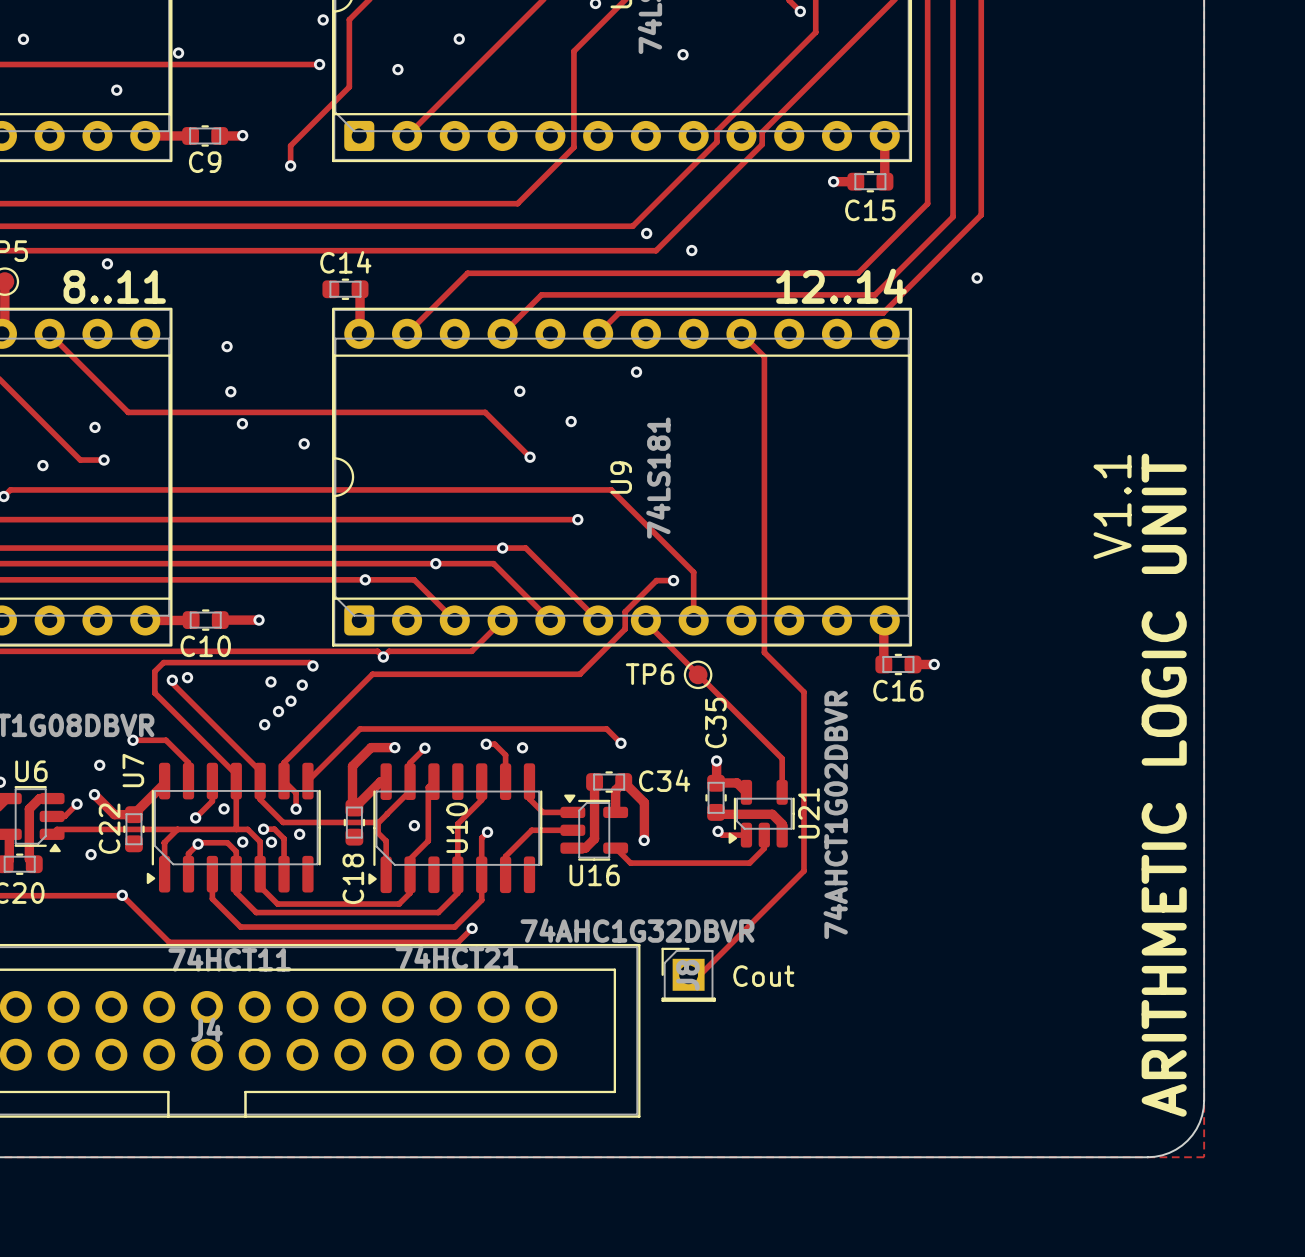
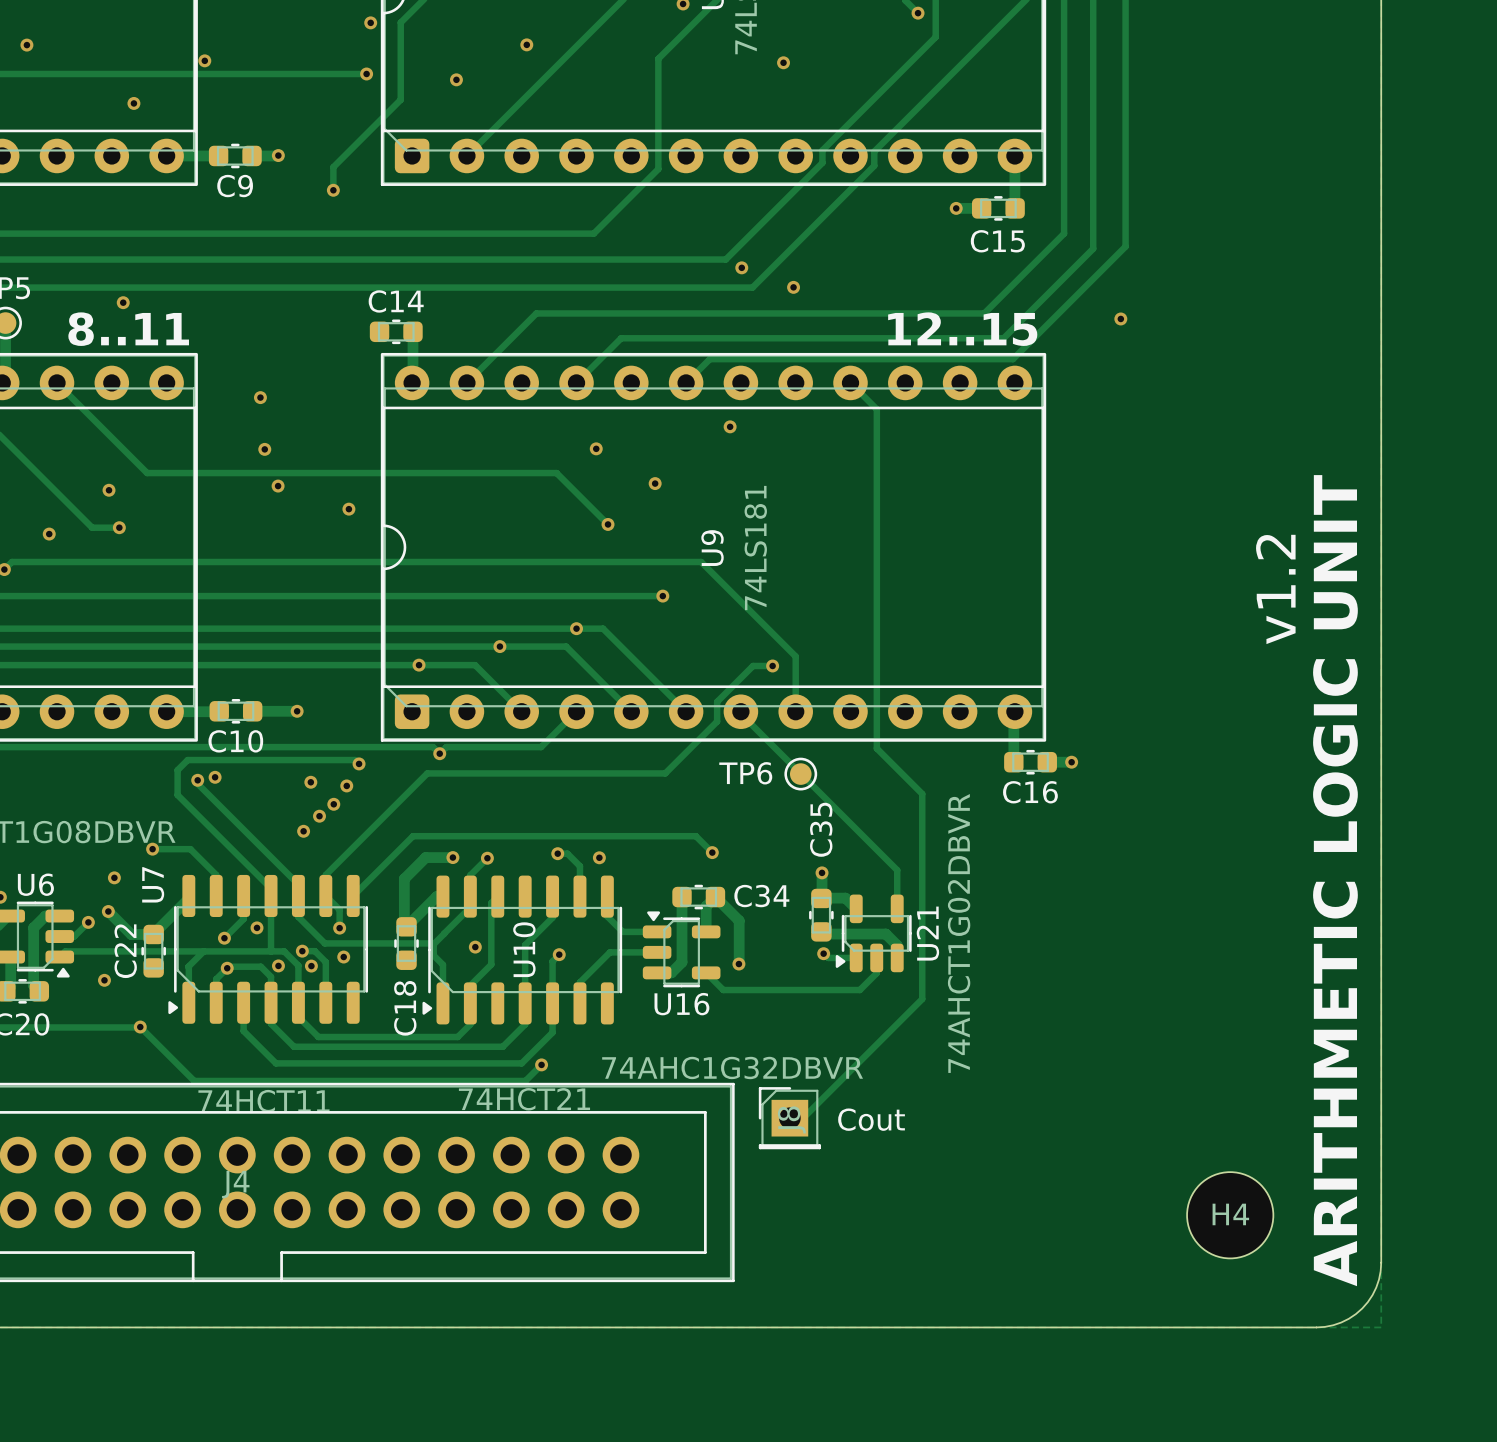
text: 12..14 (841, 286) -> 12..15 (962, 329)
text: V1.1 (1112, 506) -> v1.2 (1275, 589)
H4: none -> (1230, 1215)

